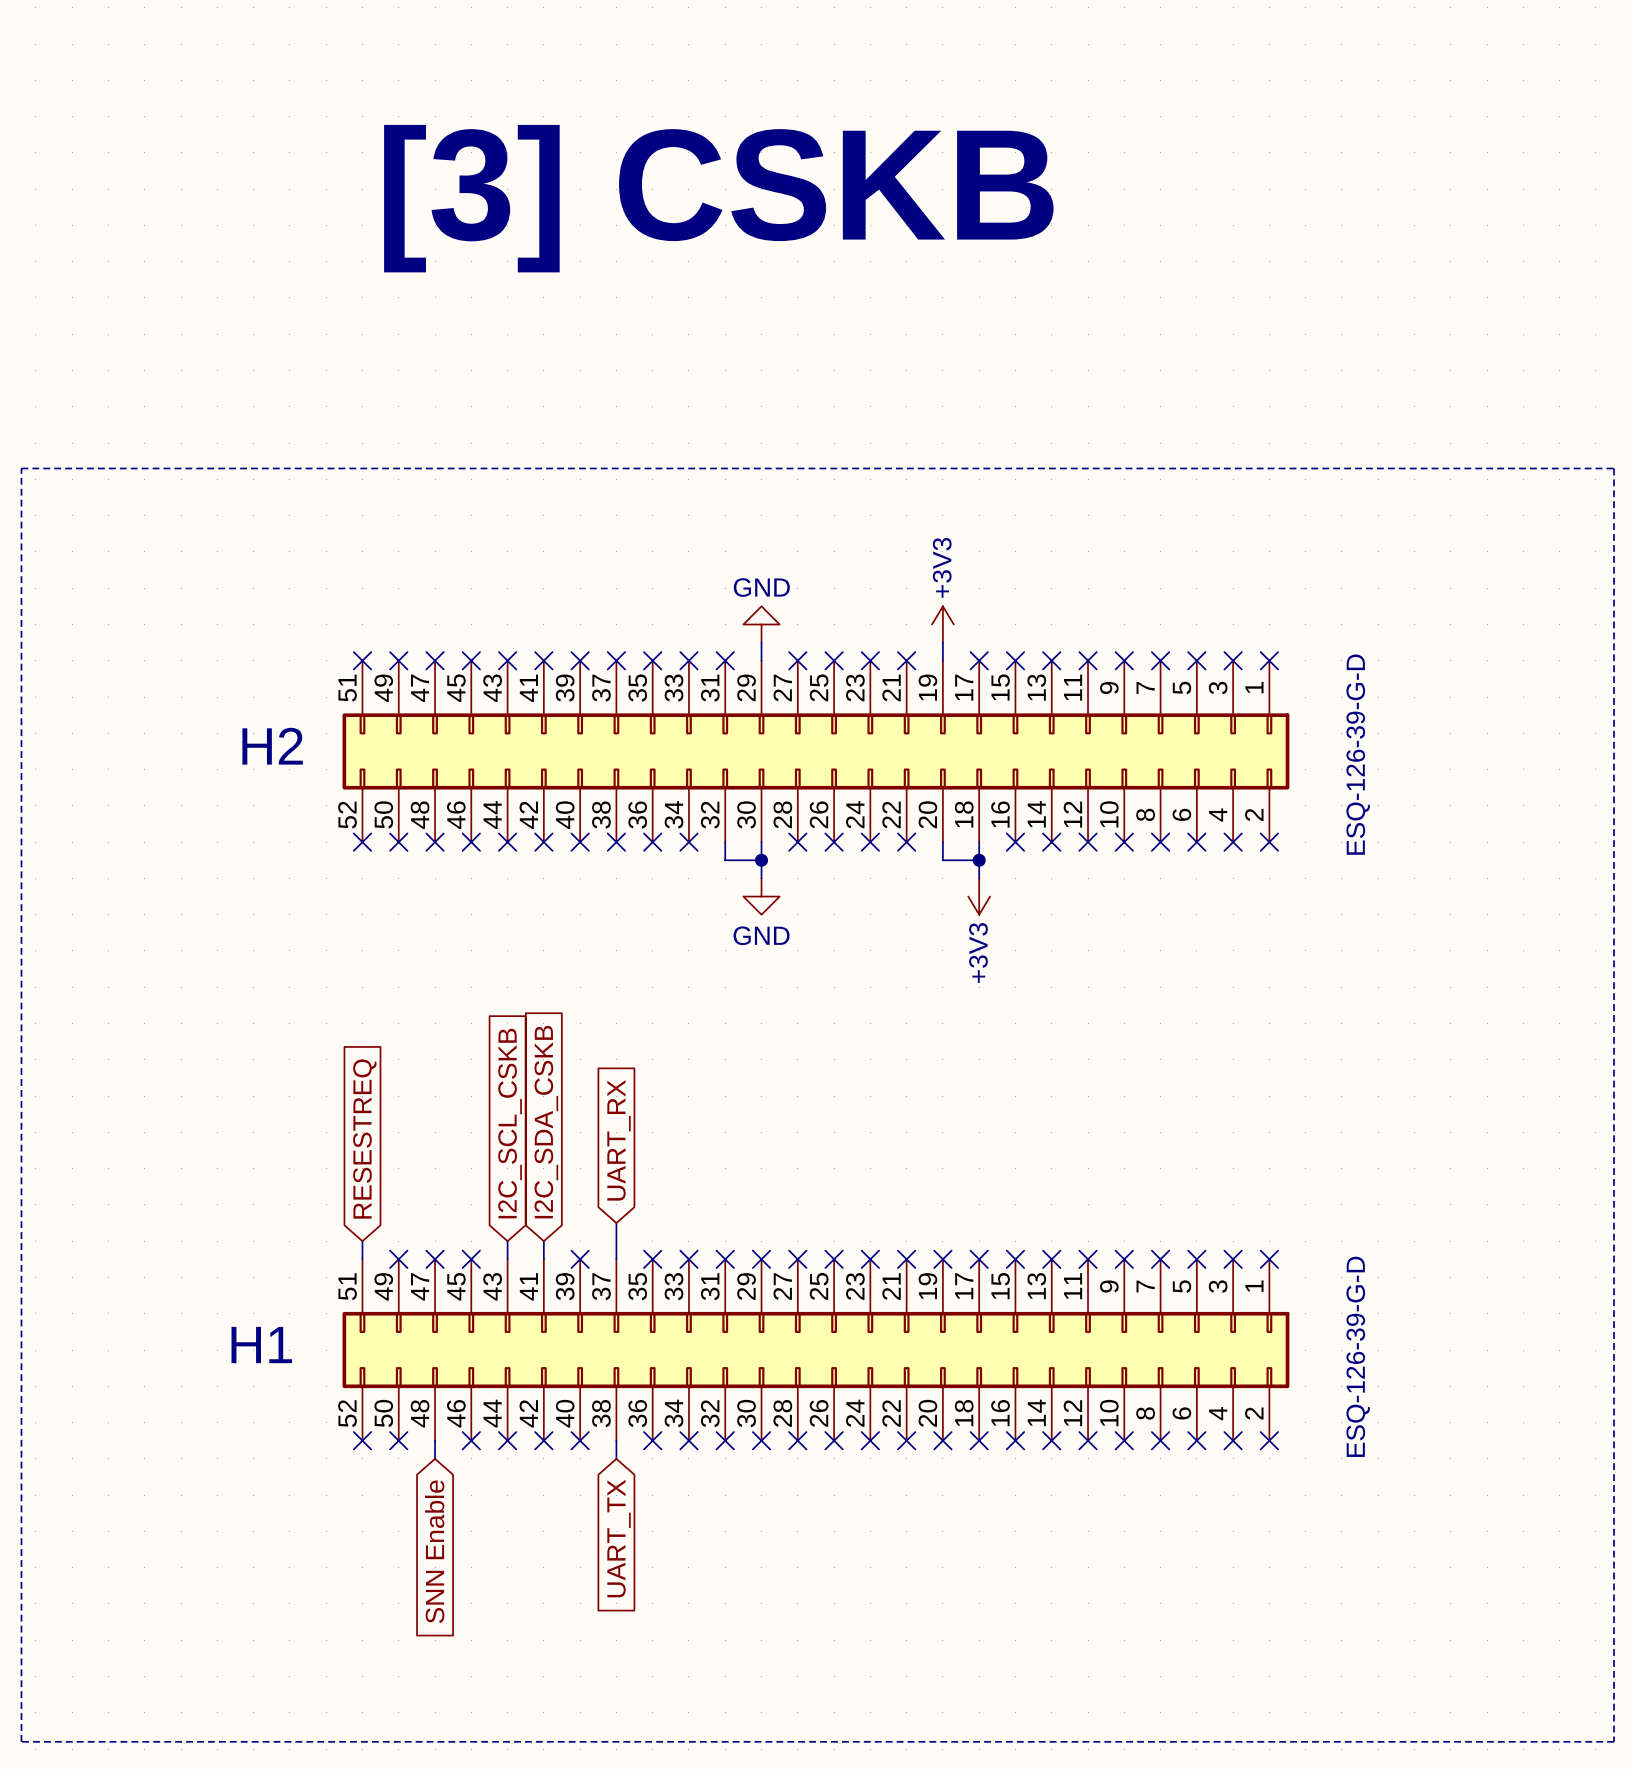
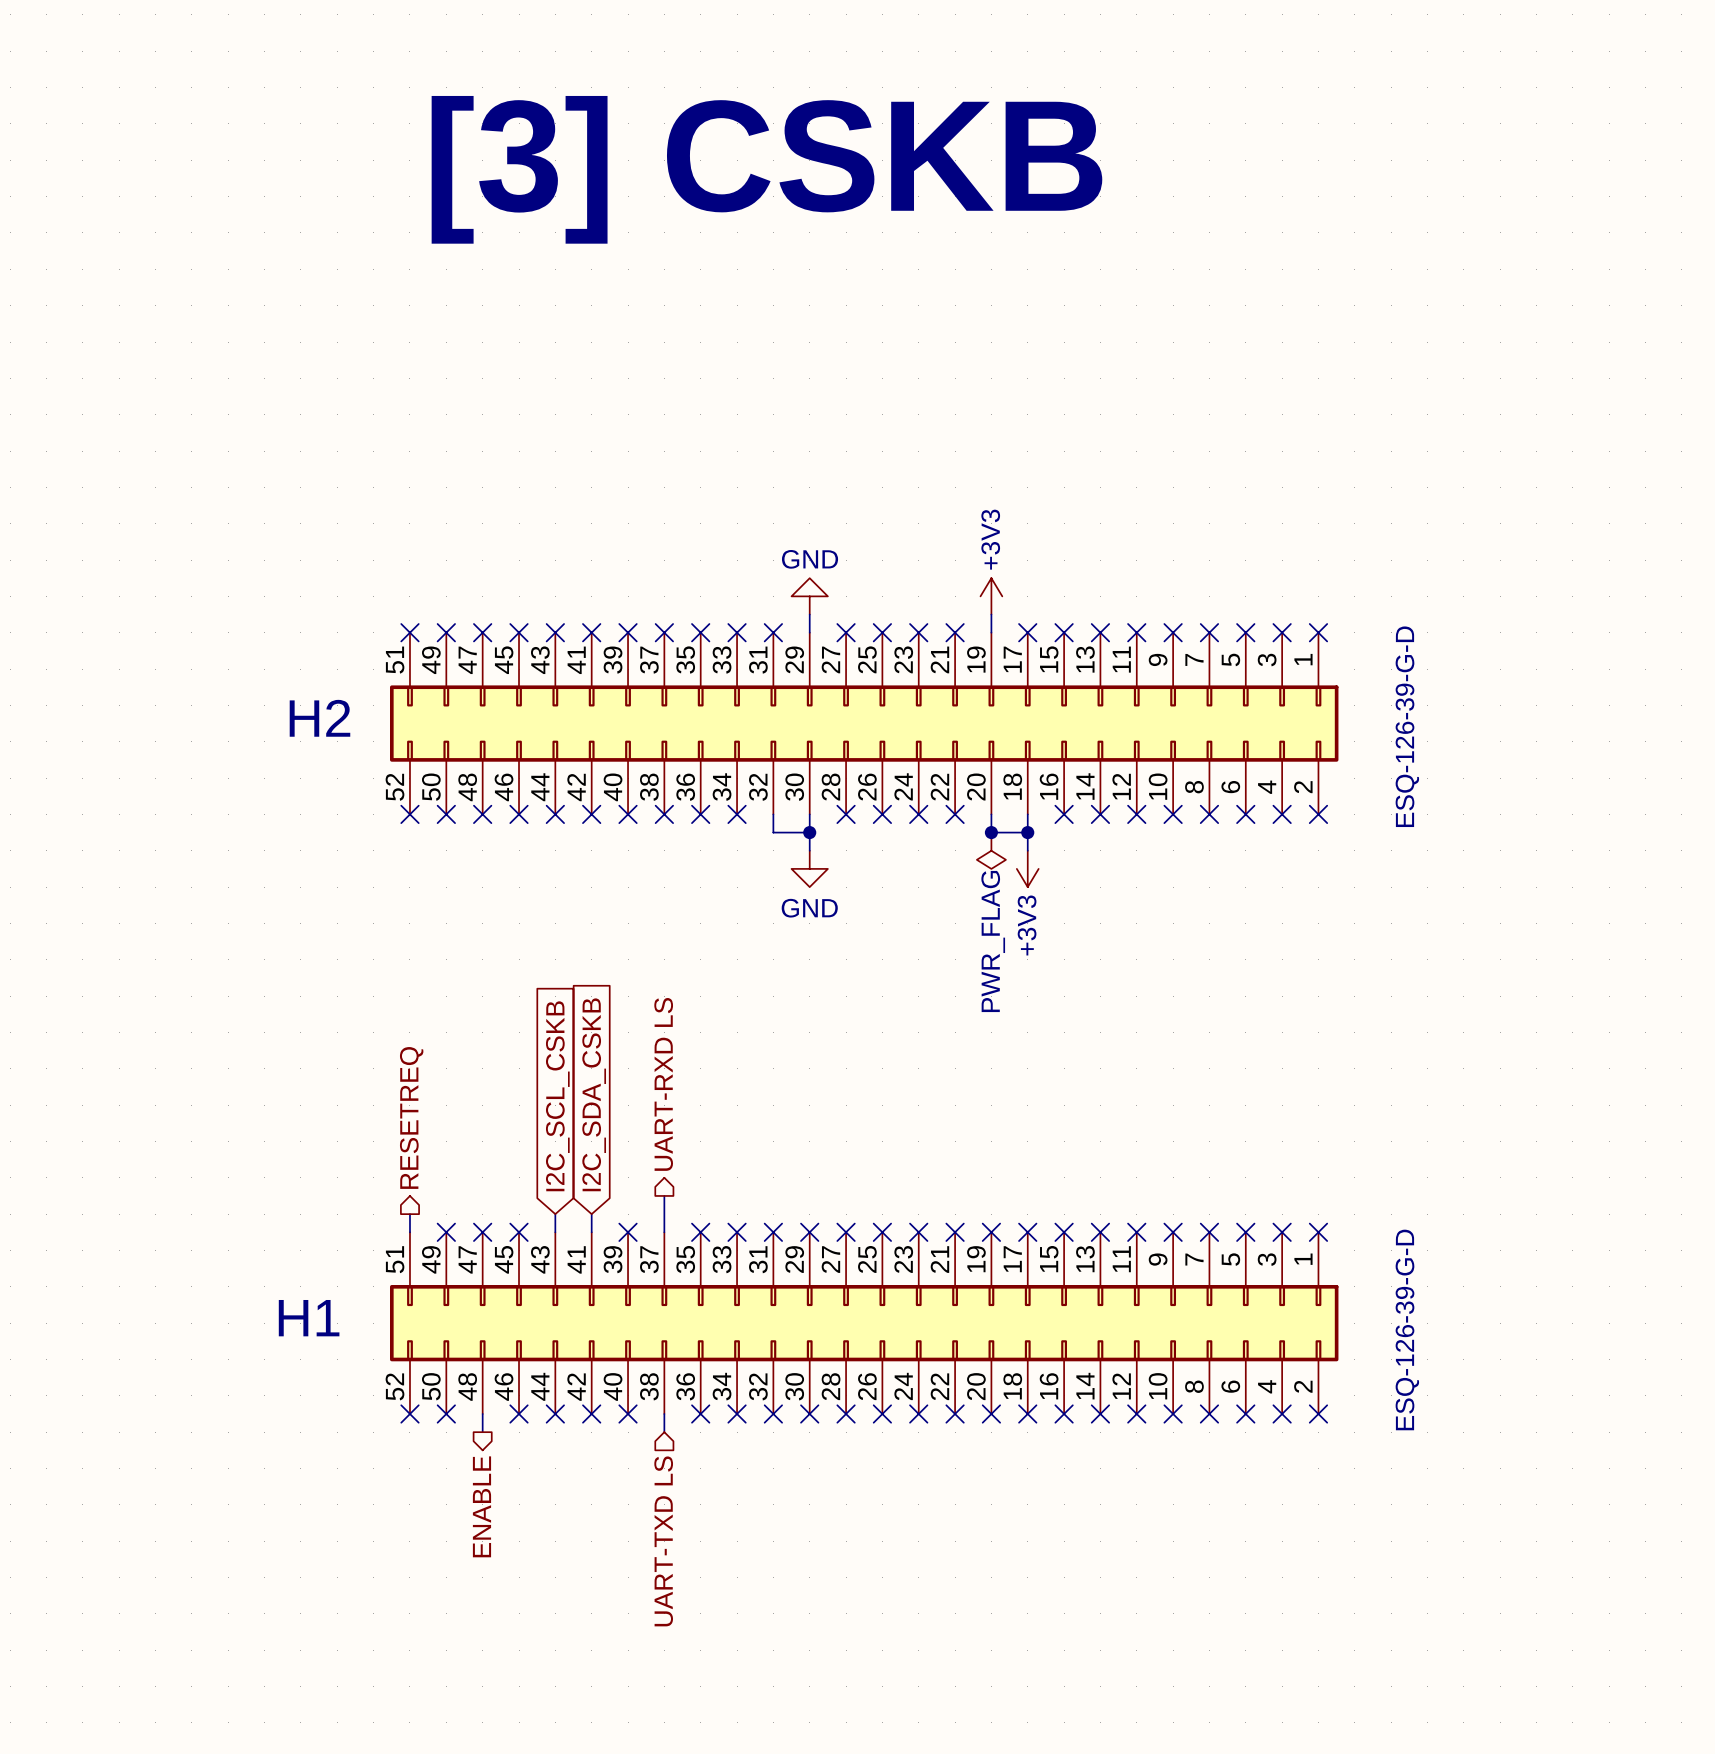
line: (21, 468) (1614, 468) (1614, 1741) (21, 1741) (21, 468) -> none
junction: none -> (991, 832)
power symbol: none -> PWR_FLAG (991, 850)
hierarchical label: none -> UART-RXD LS (663, 1084)
global label: RESESTREQ (364, 1139) -> none
global label: UART_RX (619, 1140) -> none
hierarchical label: none -> RESETREQ (411, 1117)
hierarchical label: none -> ENABLE (481, 1506)
global label: UART_TX (619, 1538) -> none
global label: SNN Enable (434, 1551) -> none
hierarchical label: none -> UART-TXD LS (663, 1541)

